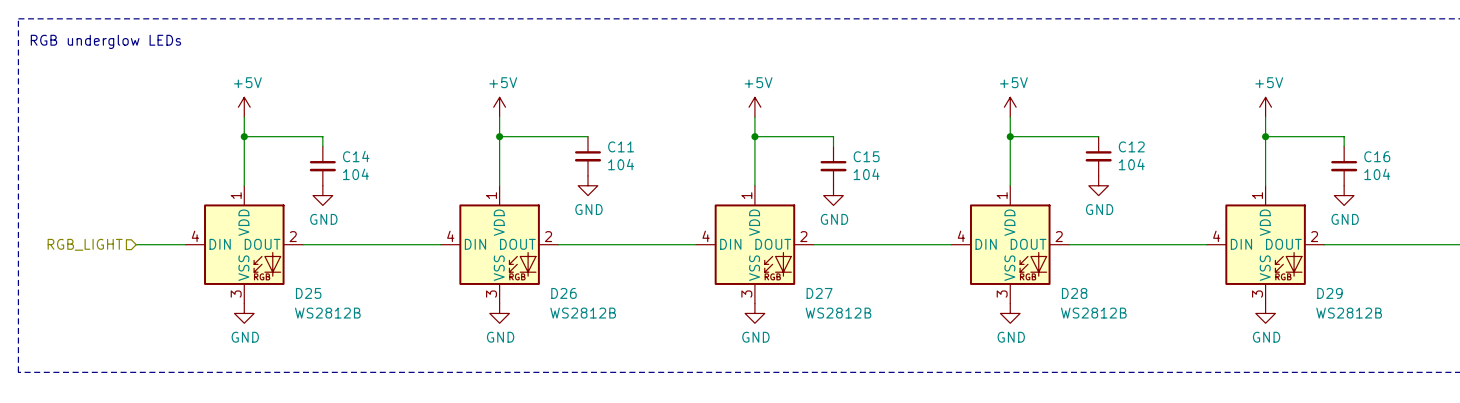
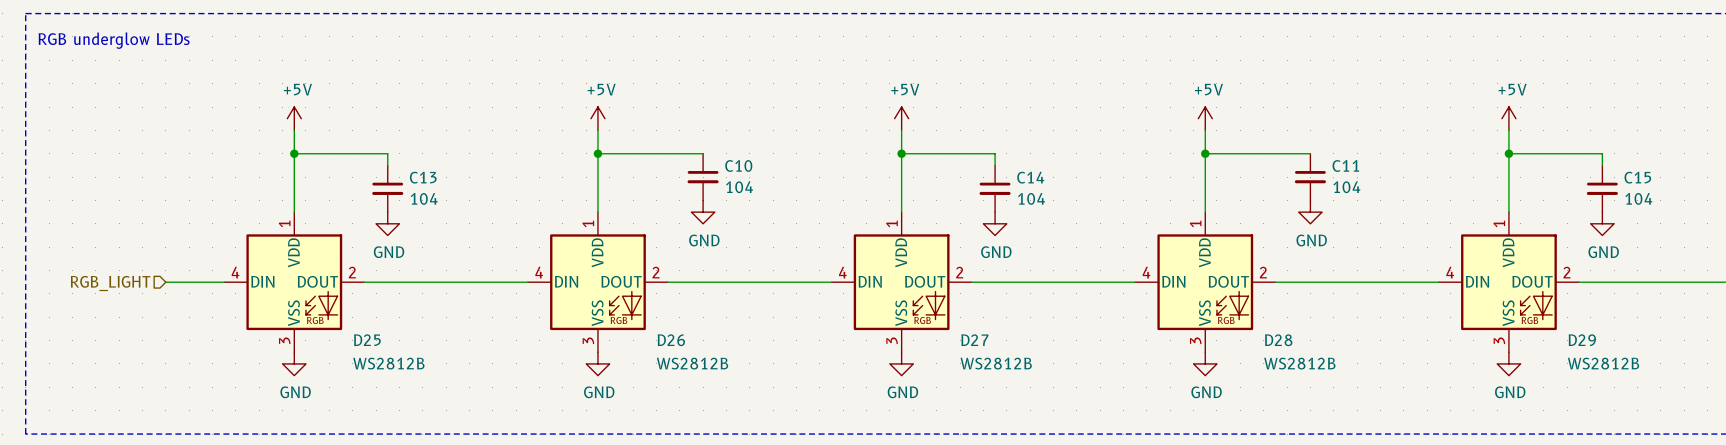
C11 name: C11 (621, 146) -> C10 (738, 165)
C12 name: C12 (1131, 146) -> C11 (1345, 165)
C14 name: C14 (356, 156) -> C13 (423, 177)
C15 name: C15 (866, 156) -> C14 (1030, 177)
C16 name: C16 (1377, 156) -> C15 (1637, 177)

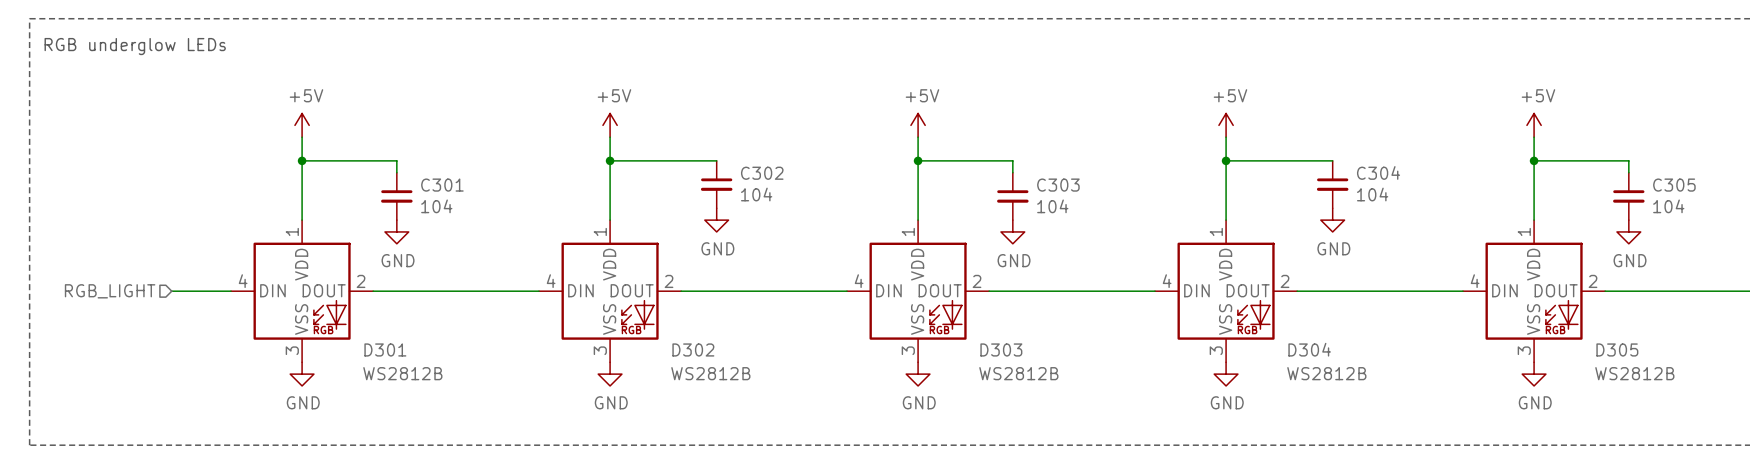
C10 name: C10 (738, 165) -> C302 (762, 173)
C11 name: C11 (1345, 165) -> C304 (1378, 172)
C13 name: C13 (423, 177) -> C301 (442, 185)
C14 name: C14 (1030, 177) -> C303 (1058, 185)
C15 name: C15 (1637, 177) -> C305 (1674, 185)
D25 name: D25 (367, 340) -> D301 (385, 349)
D26 name: D26 (671, 340) -> D302 (693, 349)
D27 name: D27 (974, 340) -> D303 (1001, 349)
D28 name: D28 (1278, 340) -> D304 (1309, 349)
D29 name: D29 (1582, 340) -> D305 (1617, 349)

